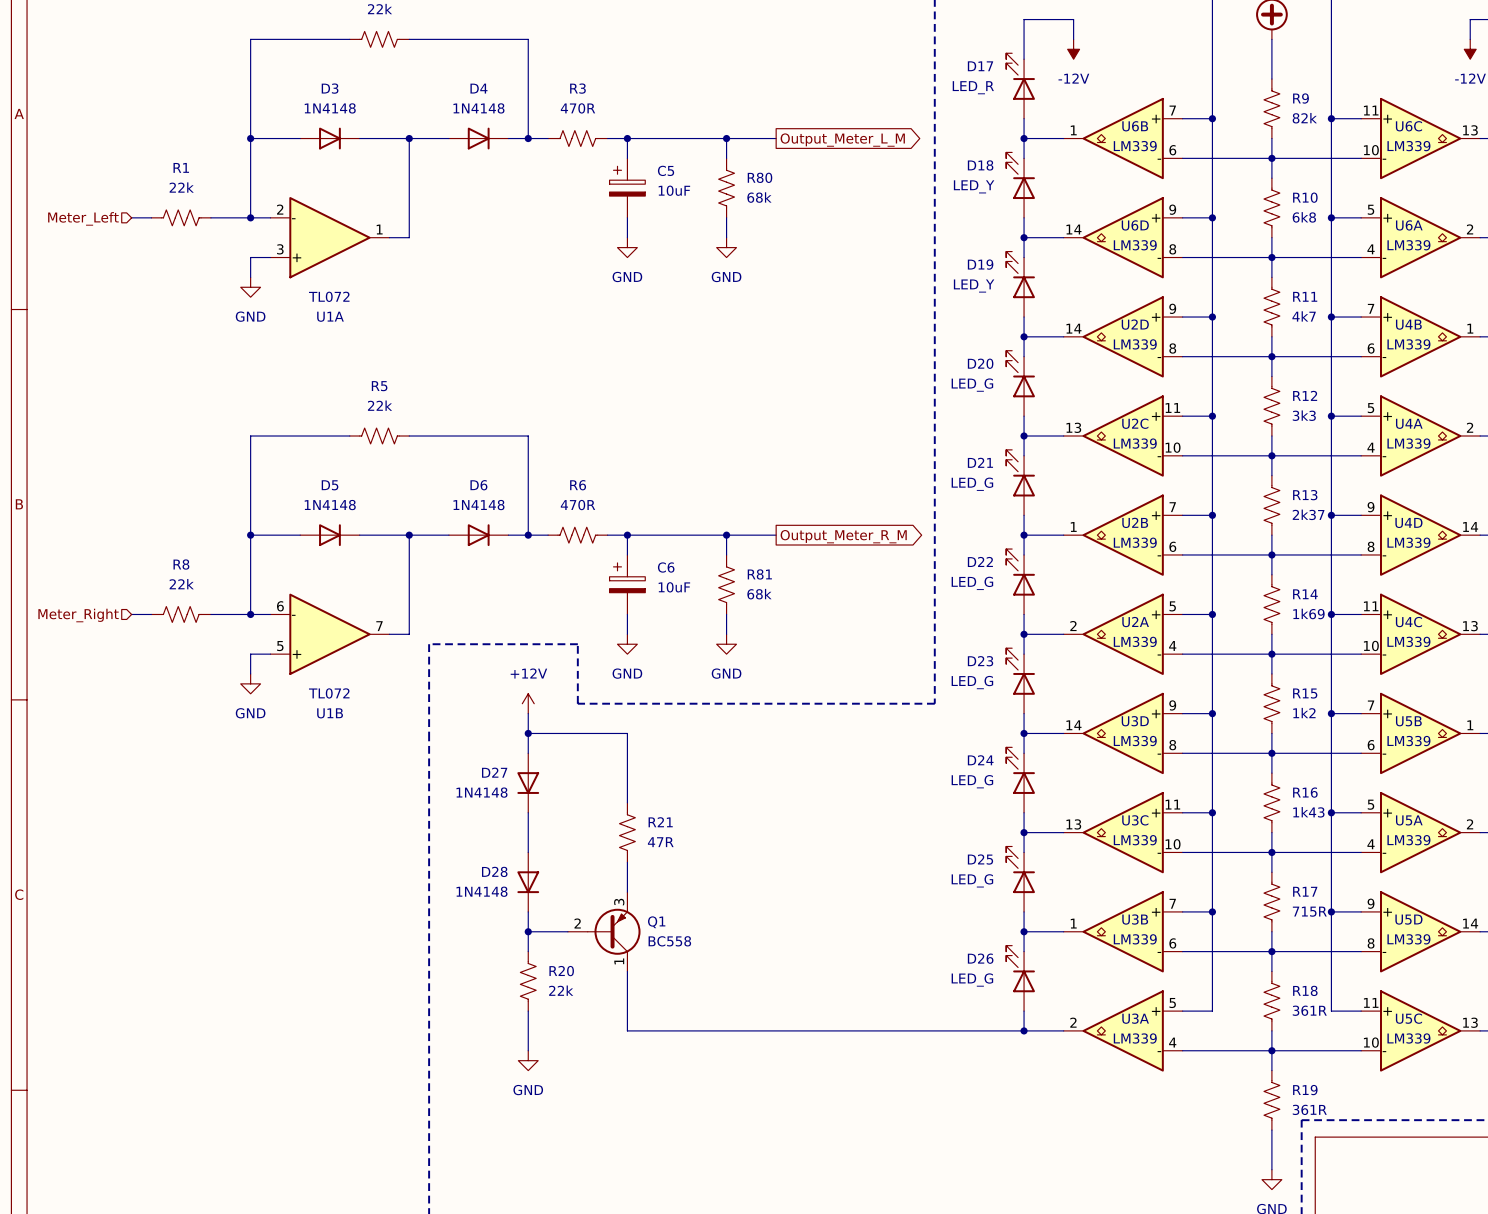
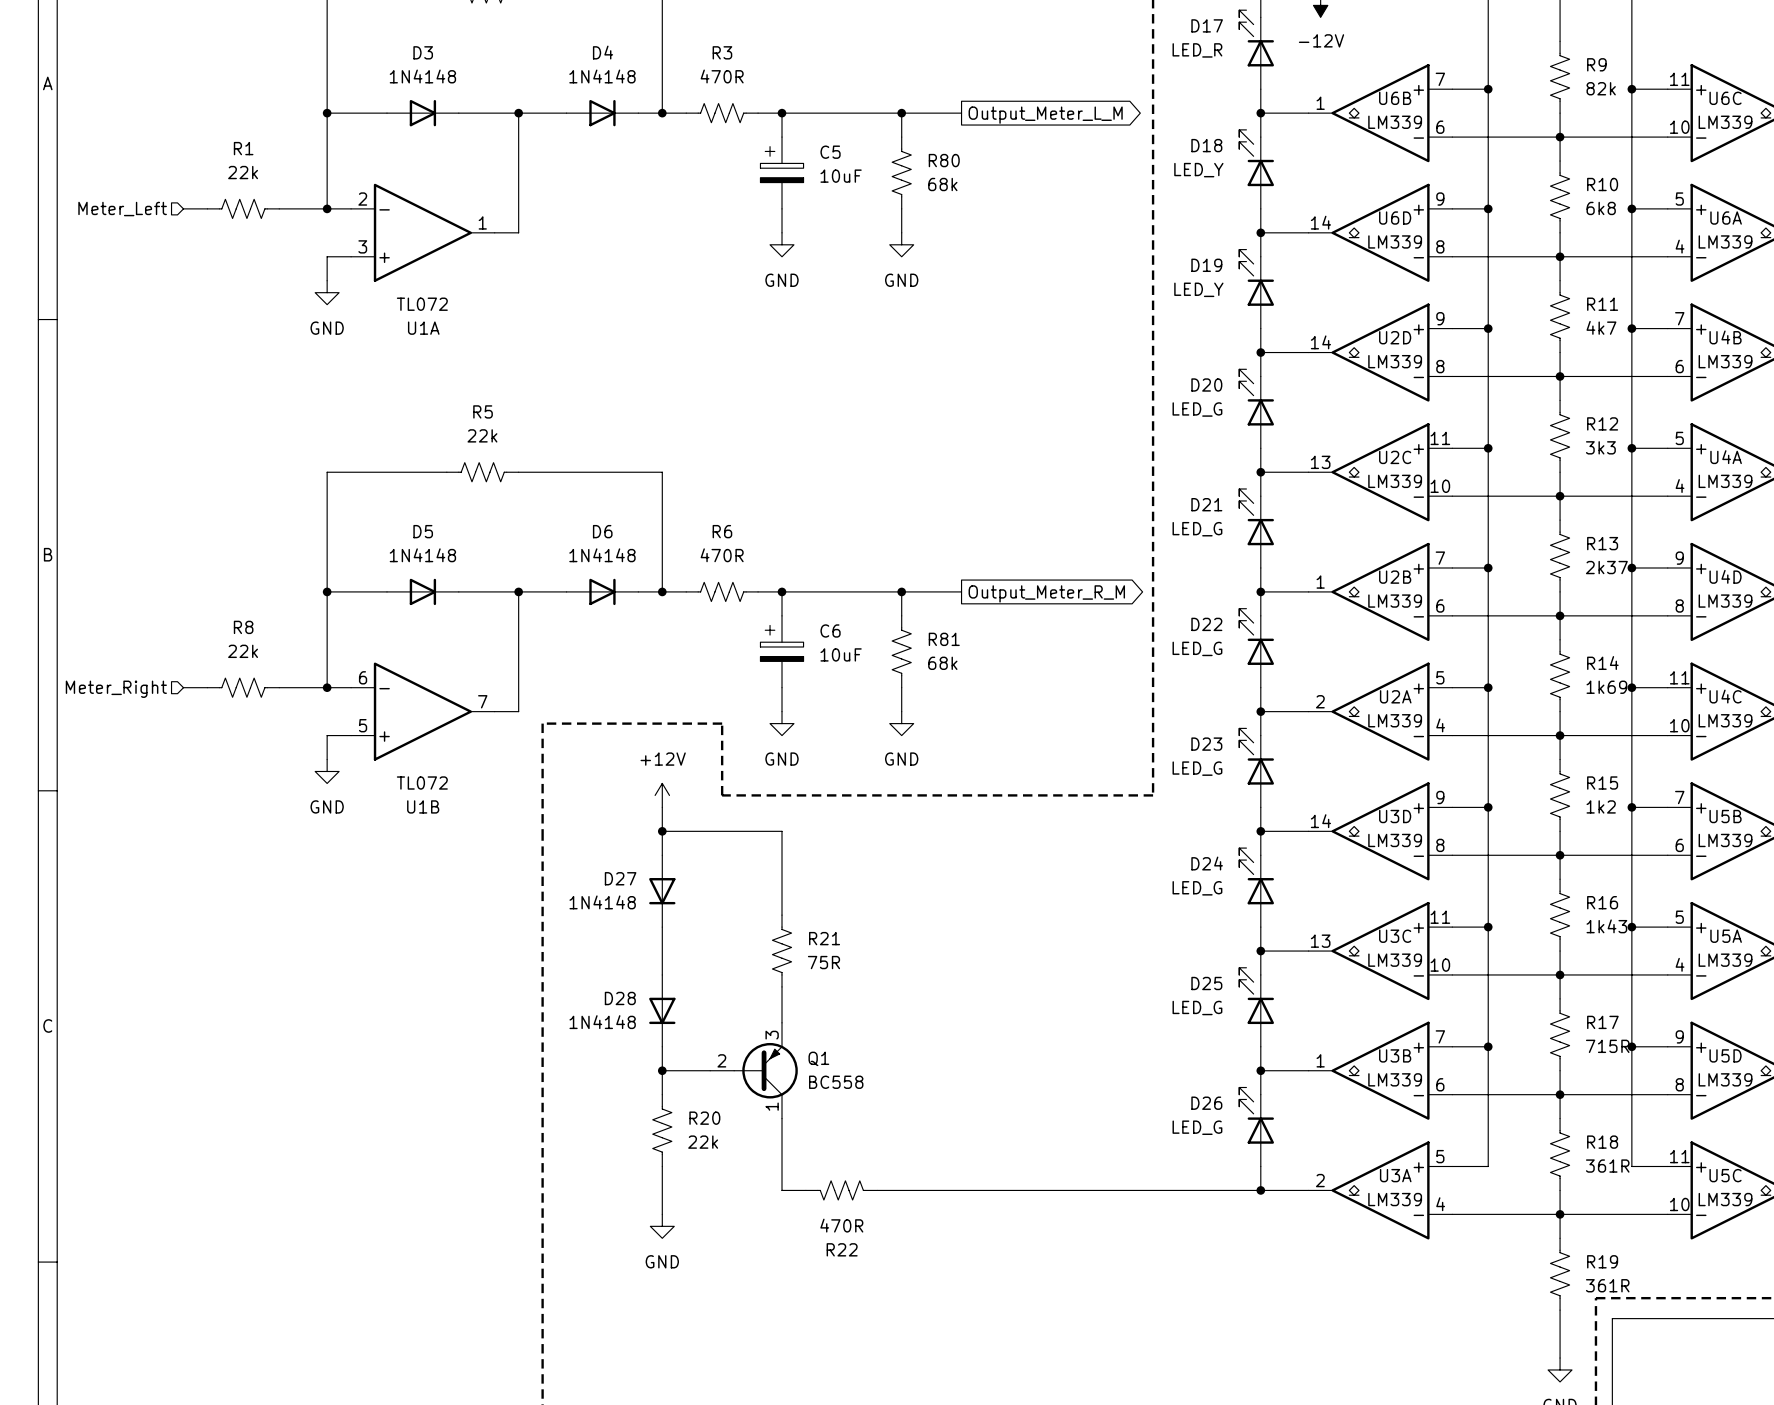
R21 value: 47R (660, 842) -> 75R (823, 962)
wire: (647, 1030) (706, 1030) -> none
R22: none -> 470R (841, 1190)

